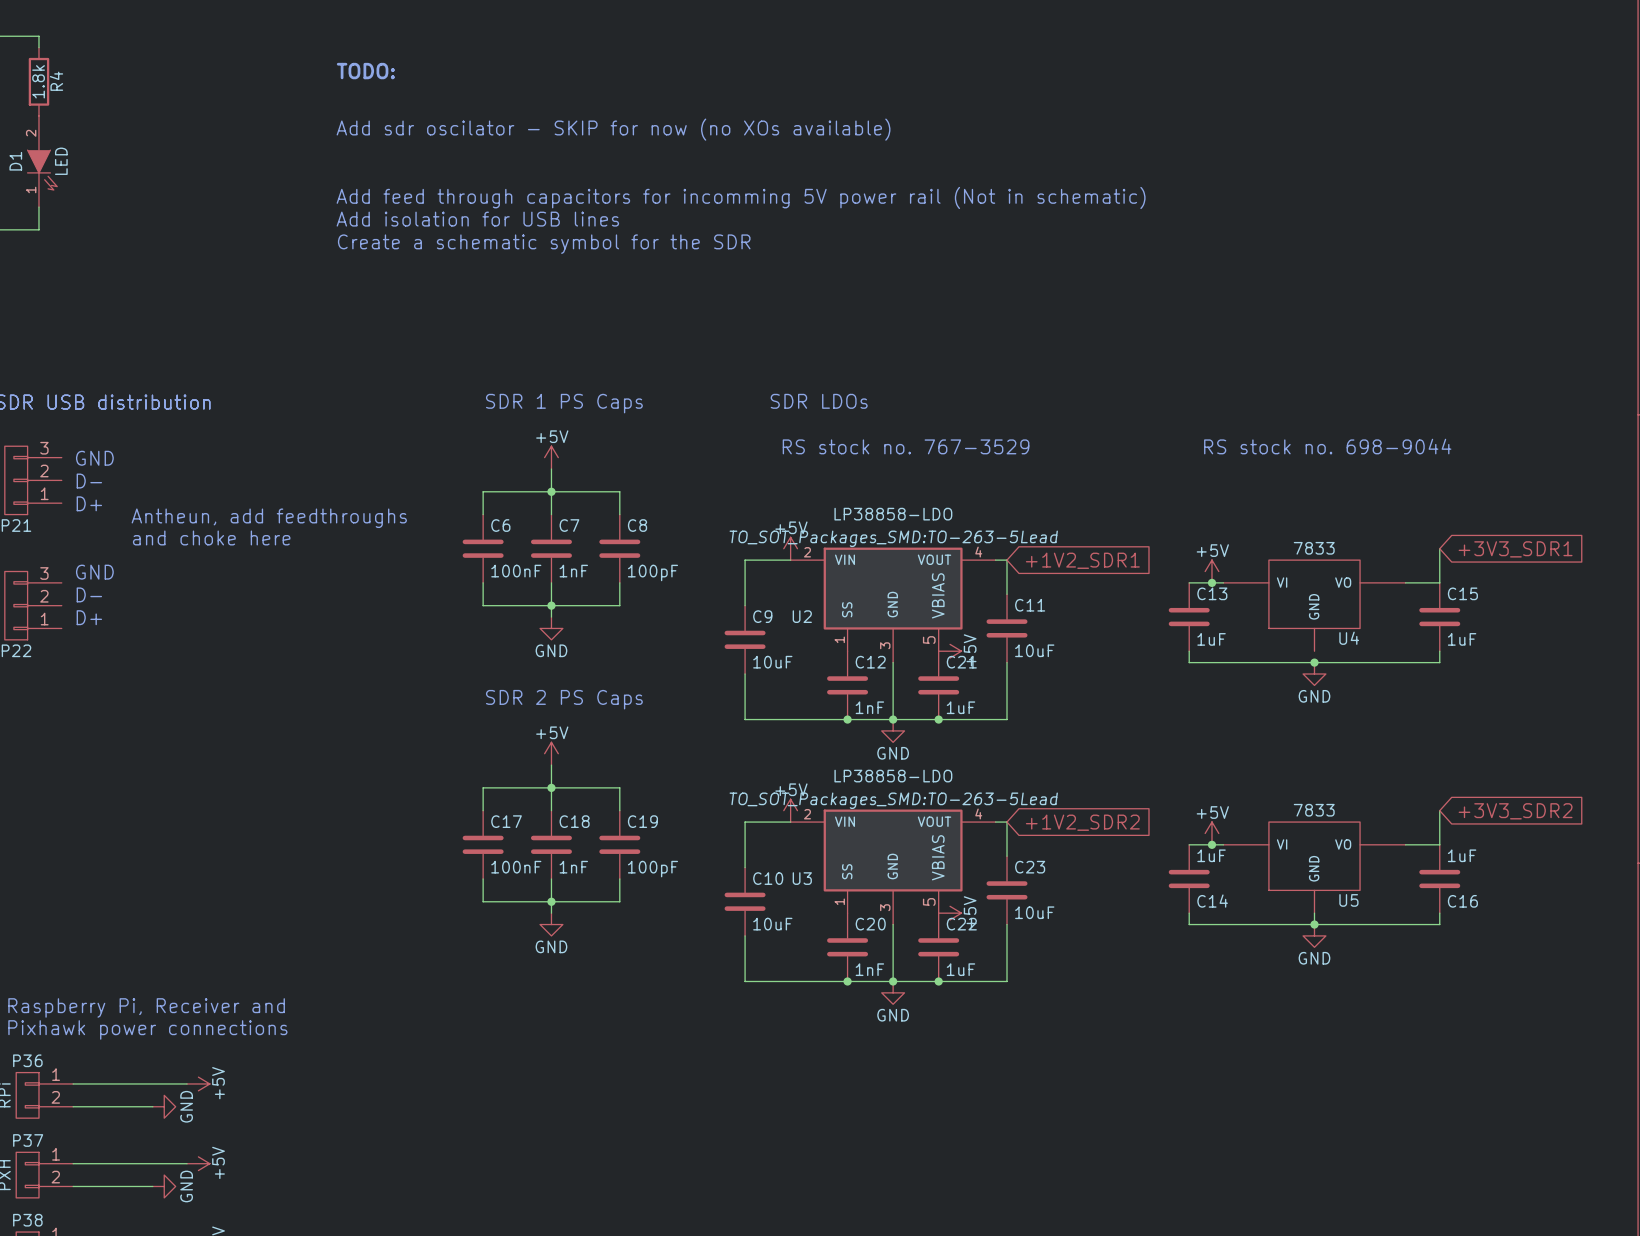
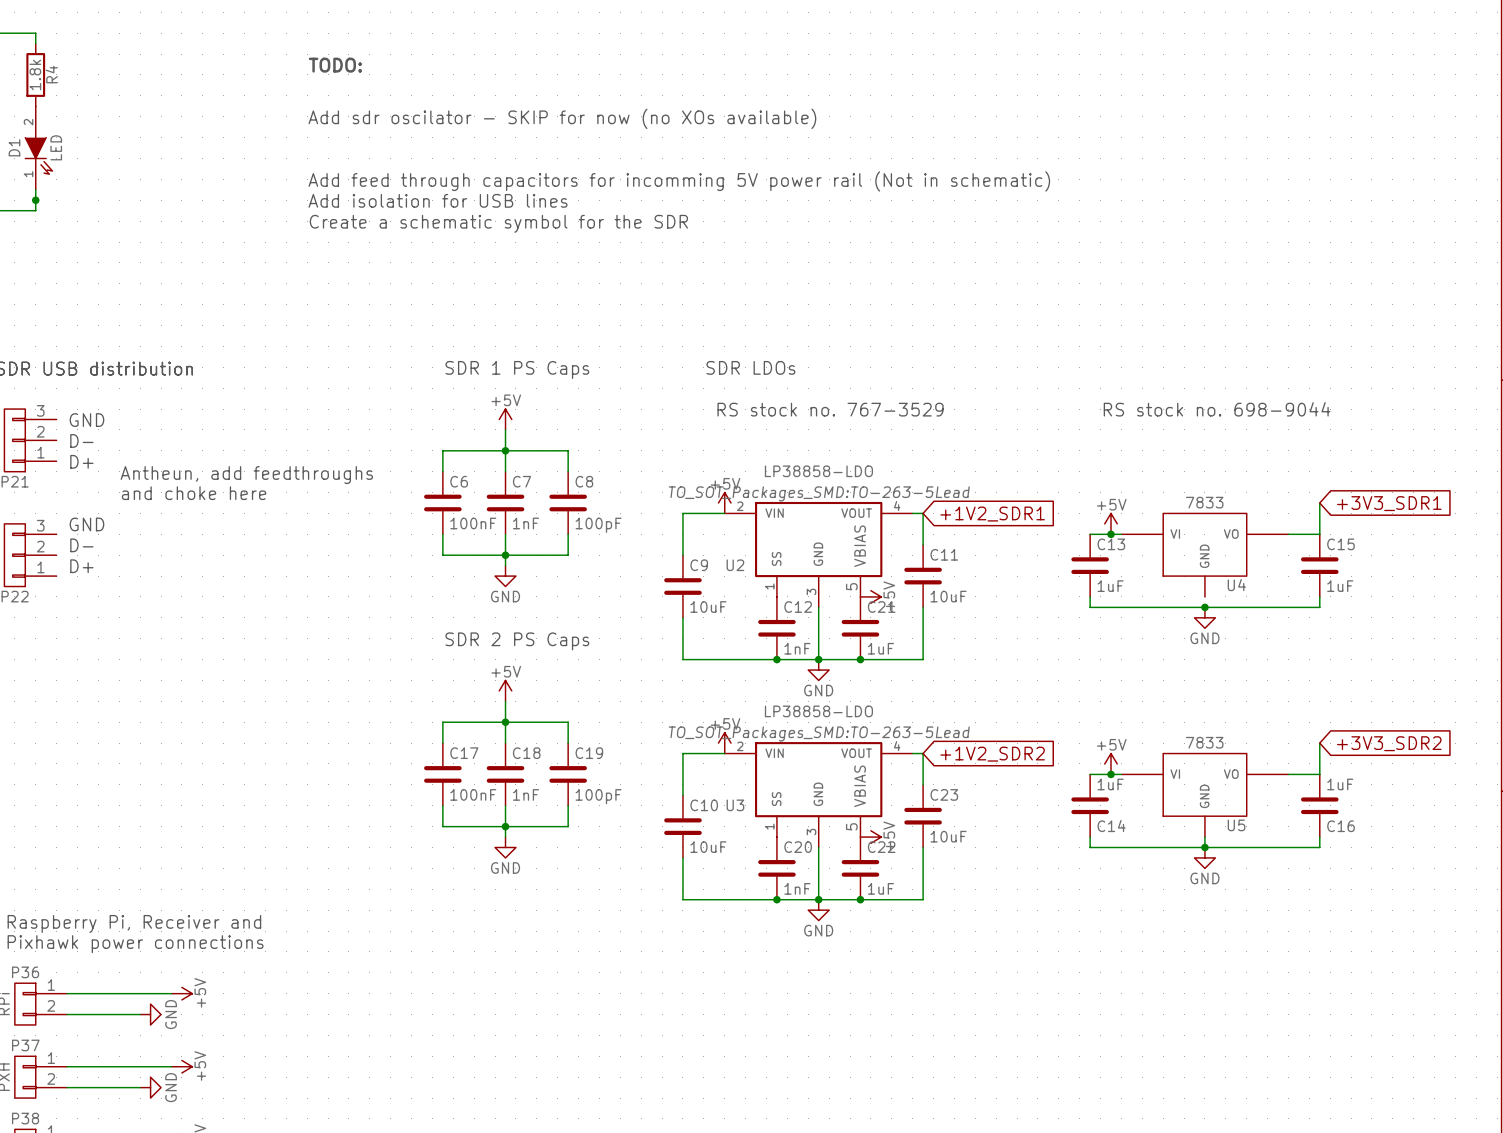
junction: none -> (35, 200)

